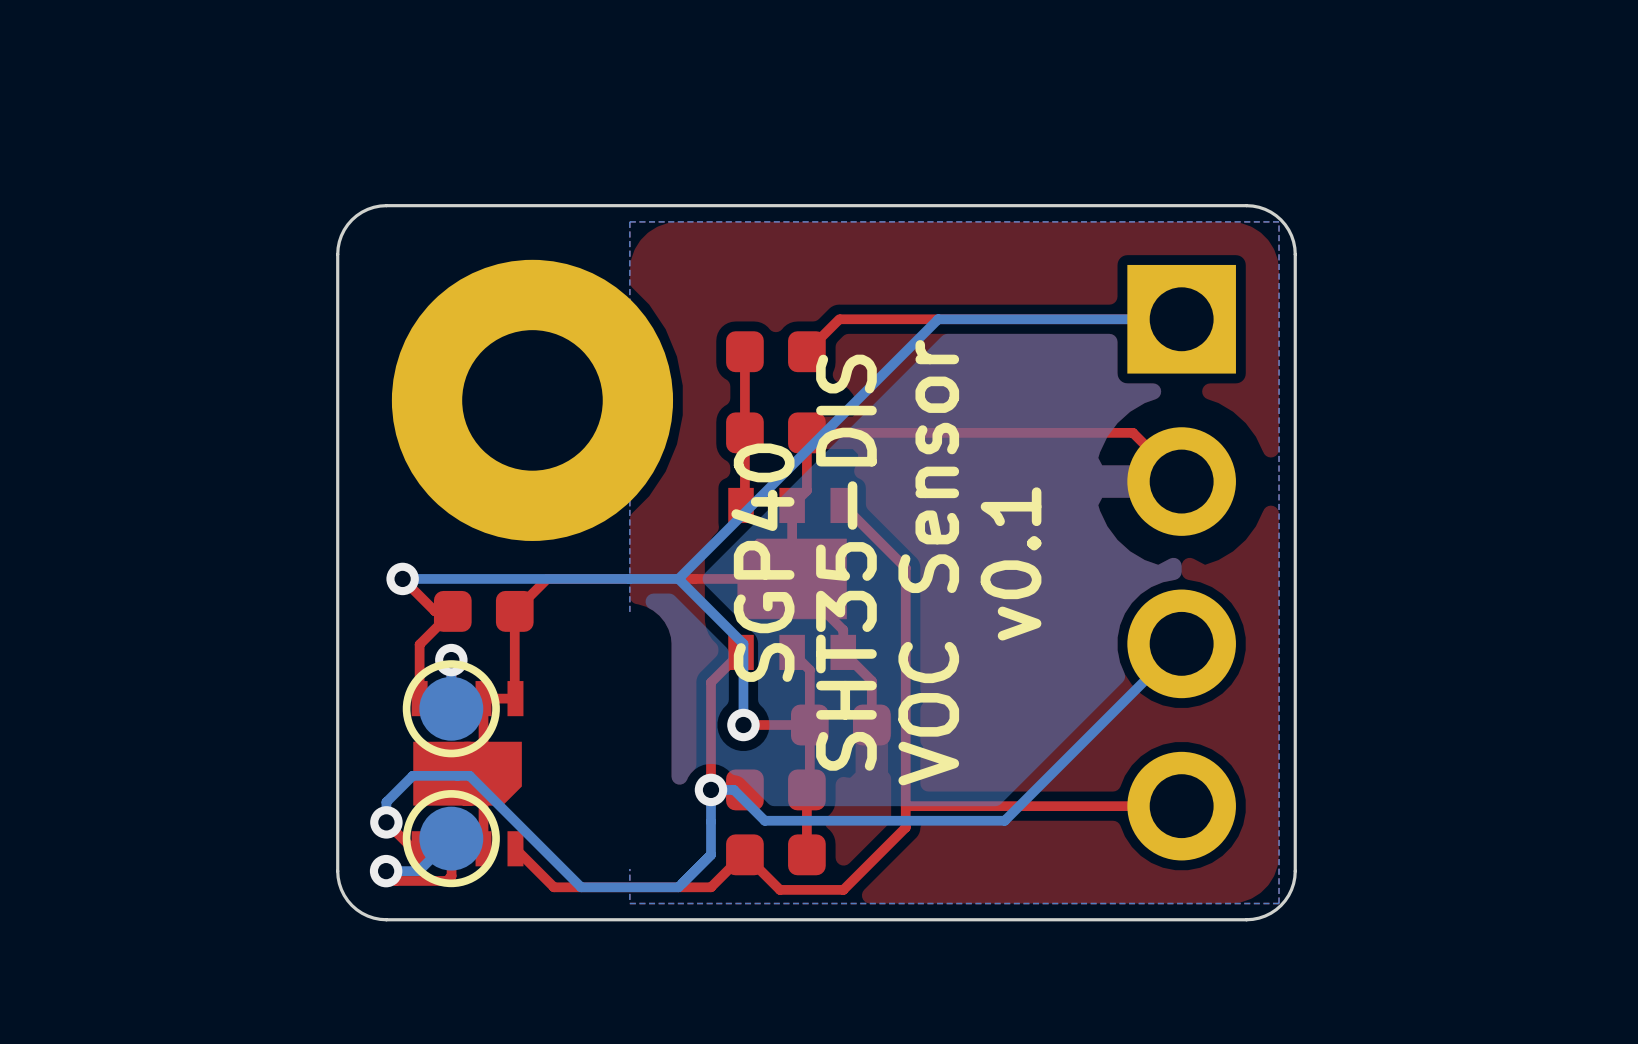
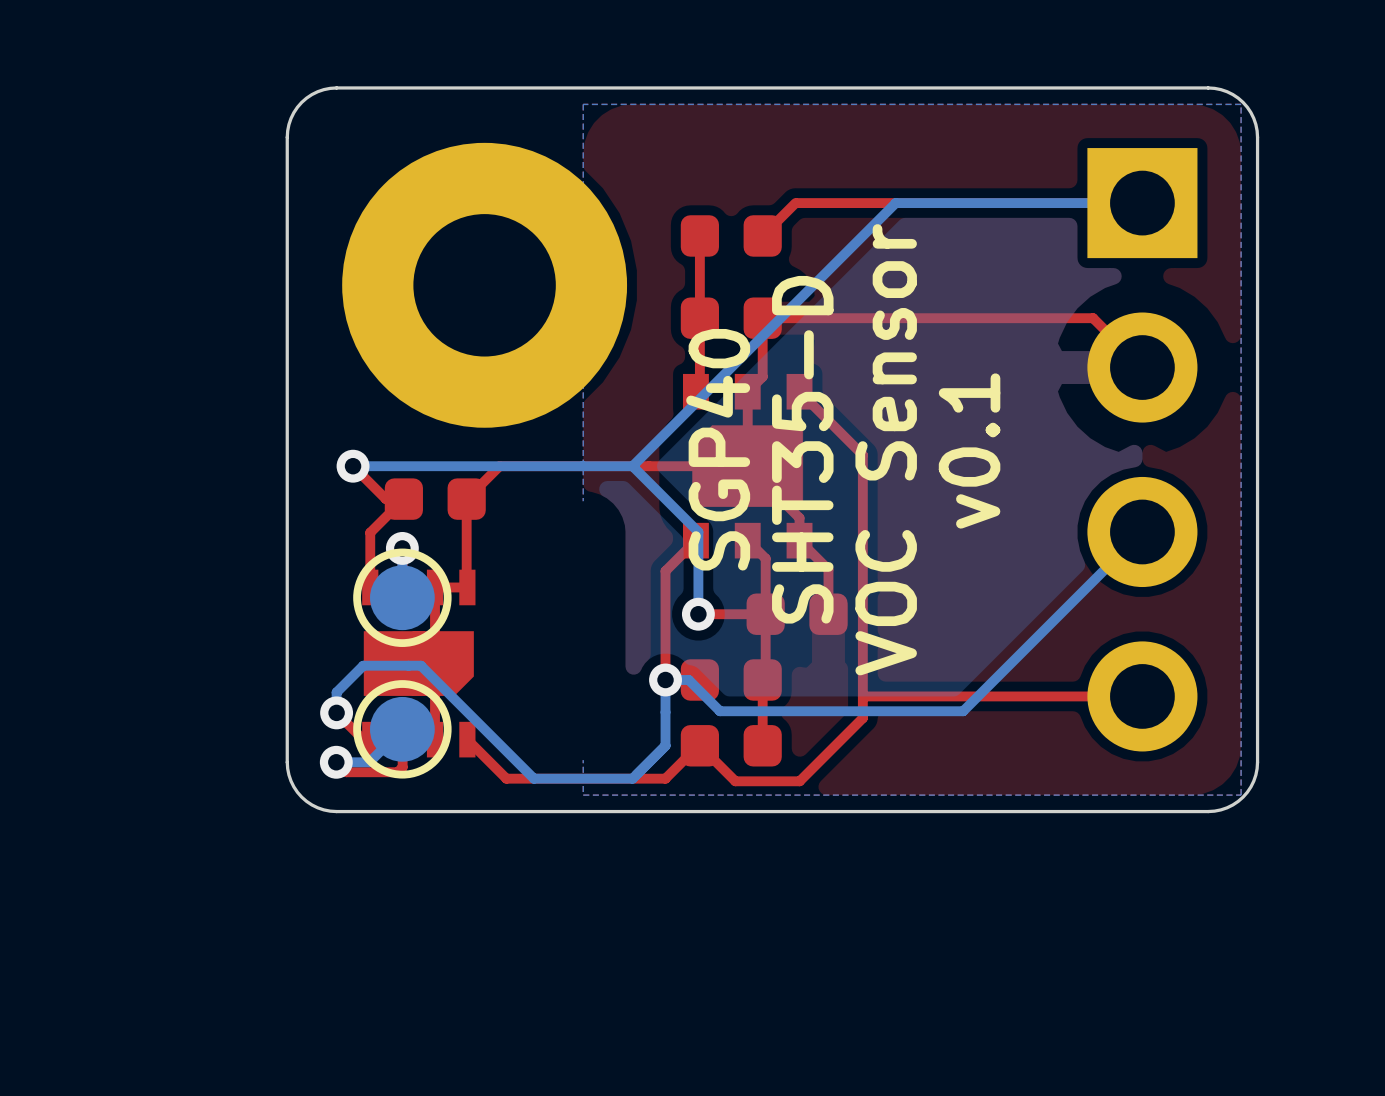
text: SHT35-DIS (846, 562) -> SHT35-D (802, 449)

